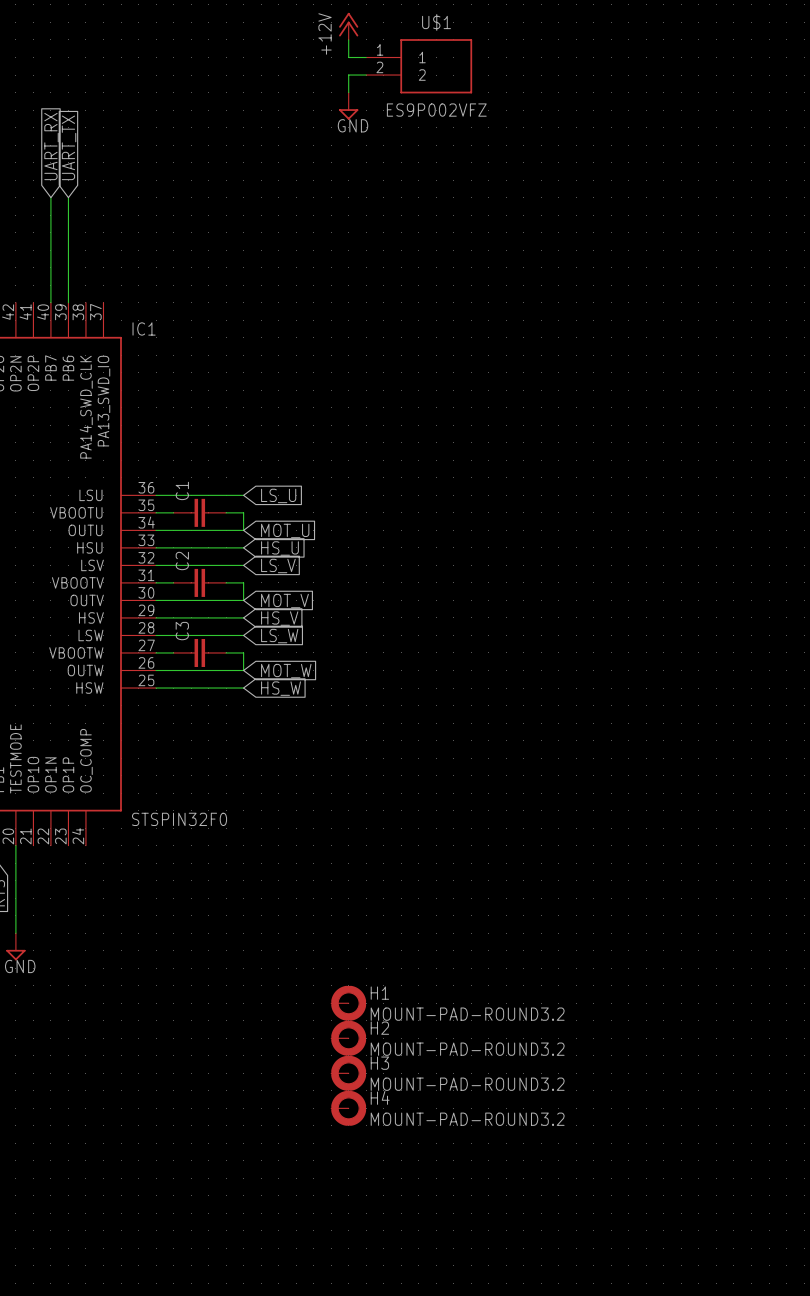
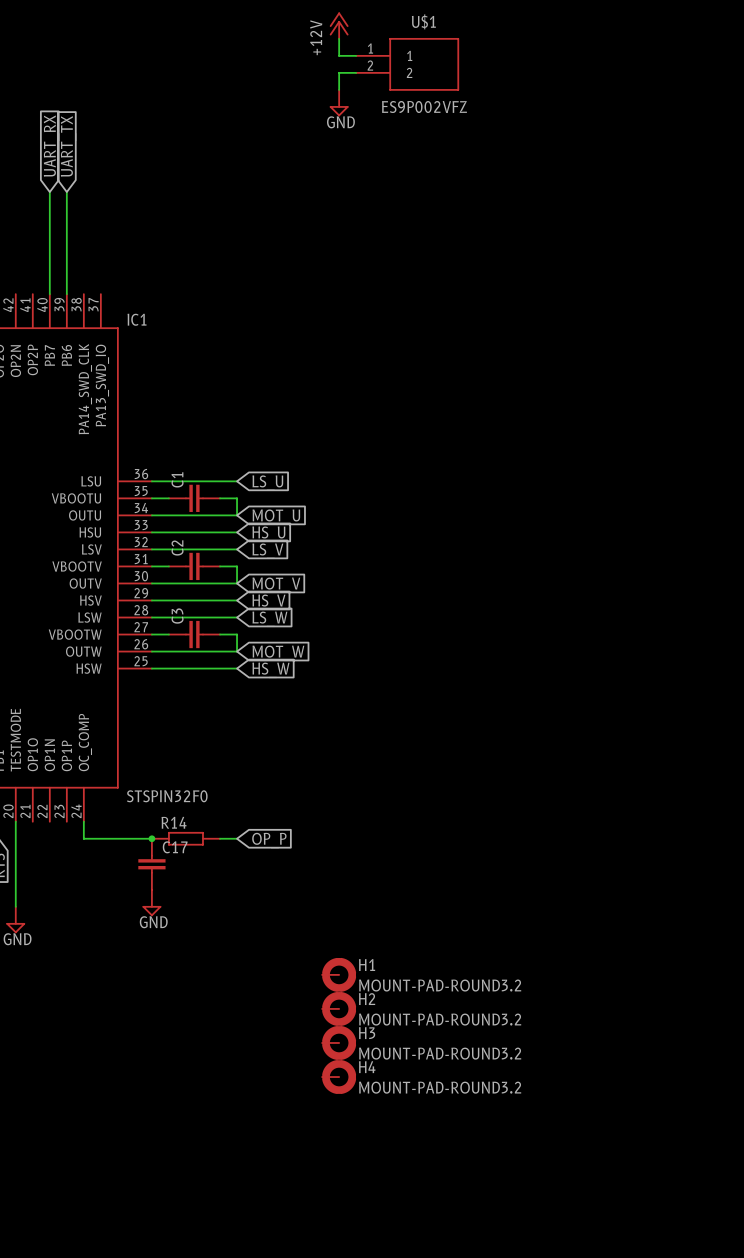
wire: none -> (83, 821) (83, 838) (151, 838)
junction: none -> (151, 838)
R14: none -> (185, 838)
wire: none -> (220, 838) (237, 838)
global label: none -> OP_P (269, 840)
C17: none -> (151, 864)
power symbol: none -> GND (151, 903)

